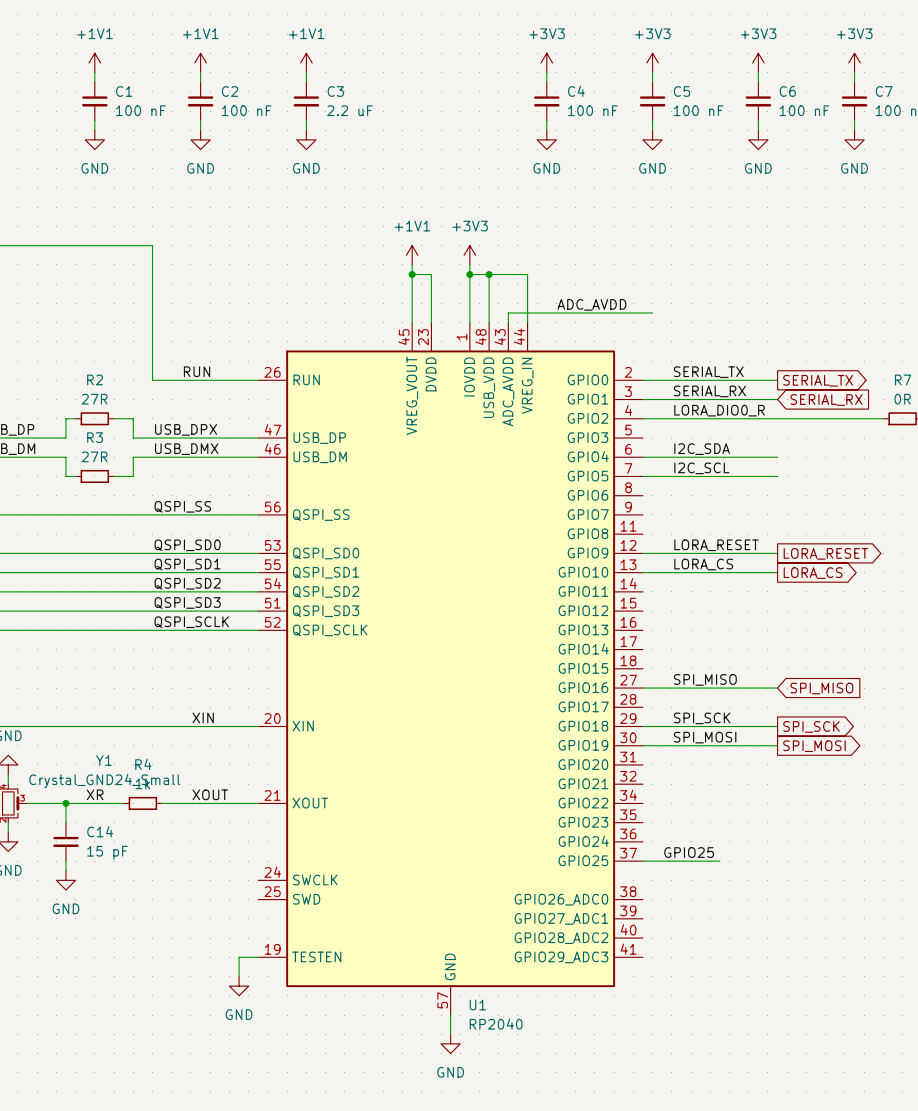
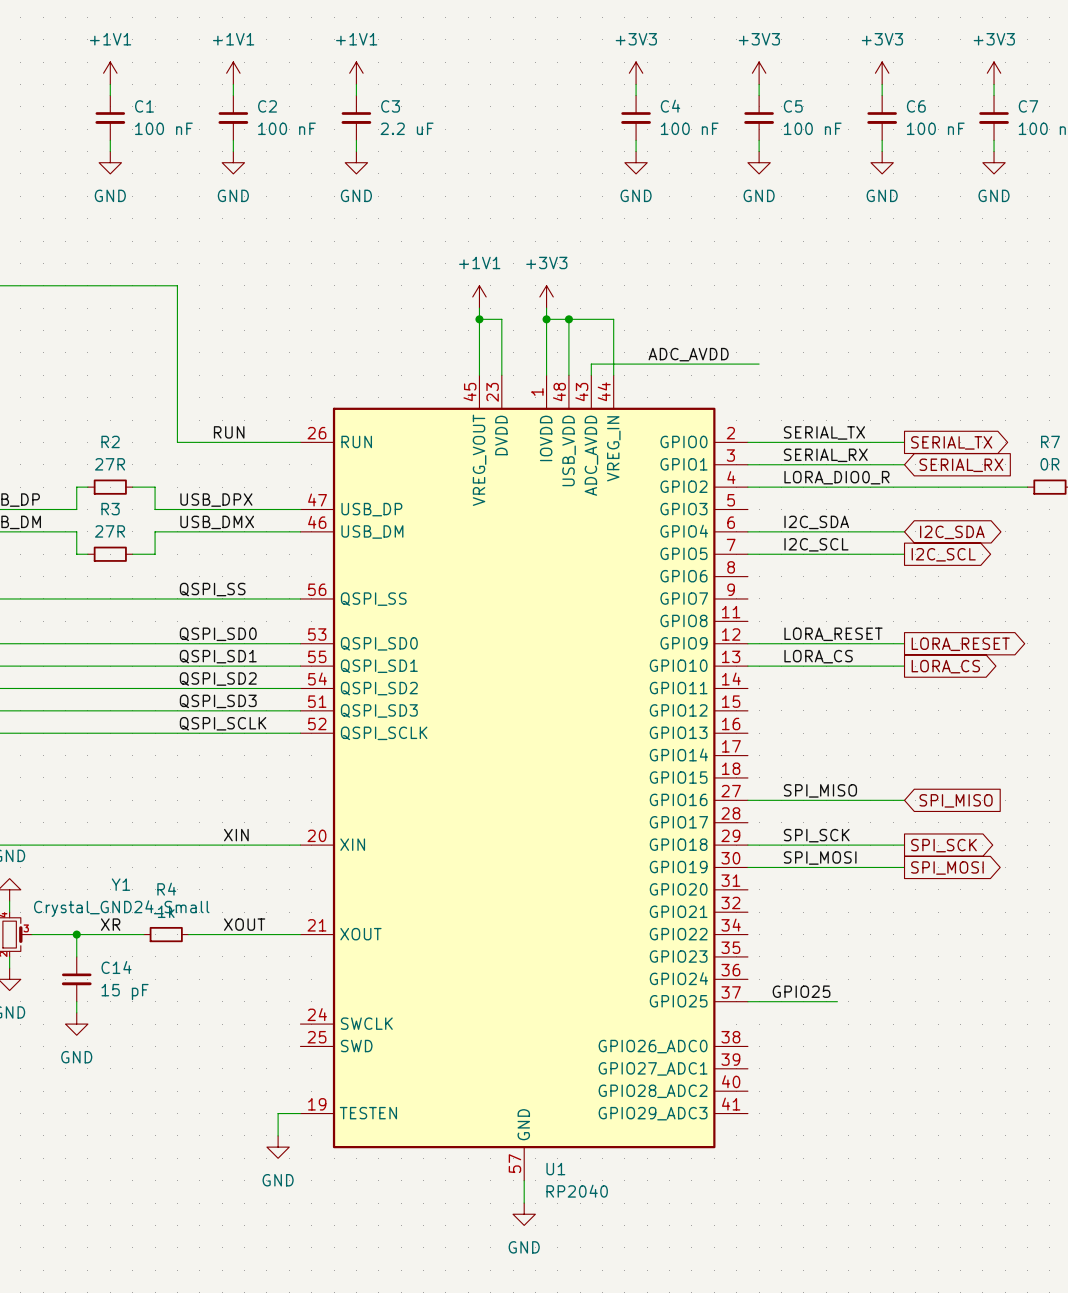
global label: none -> I2C_SDA (952, 532)
global label: none -> I2C_SCL (943, 554)

